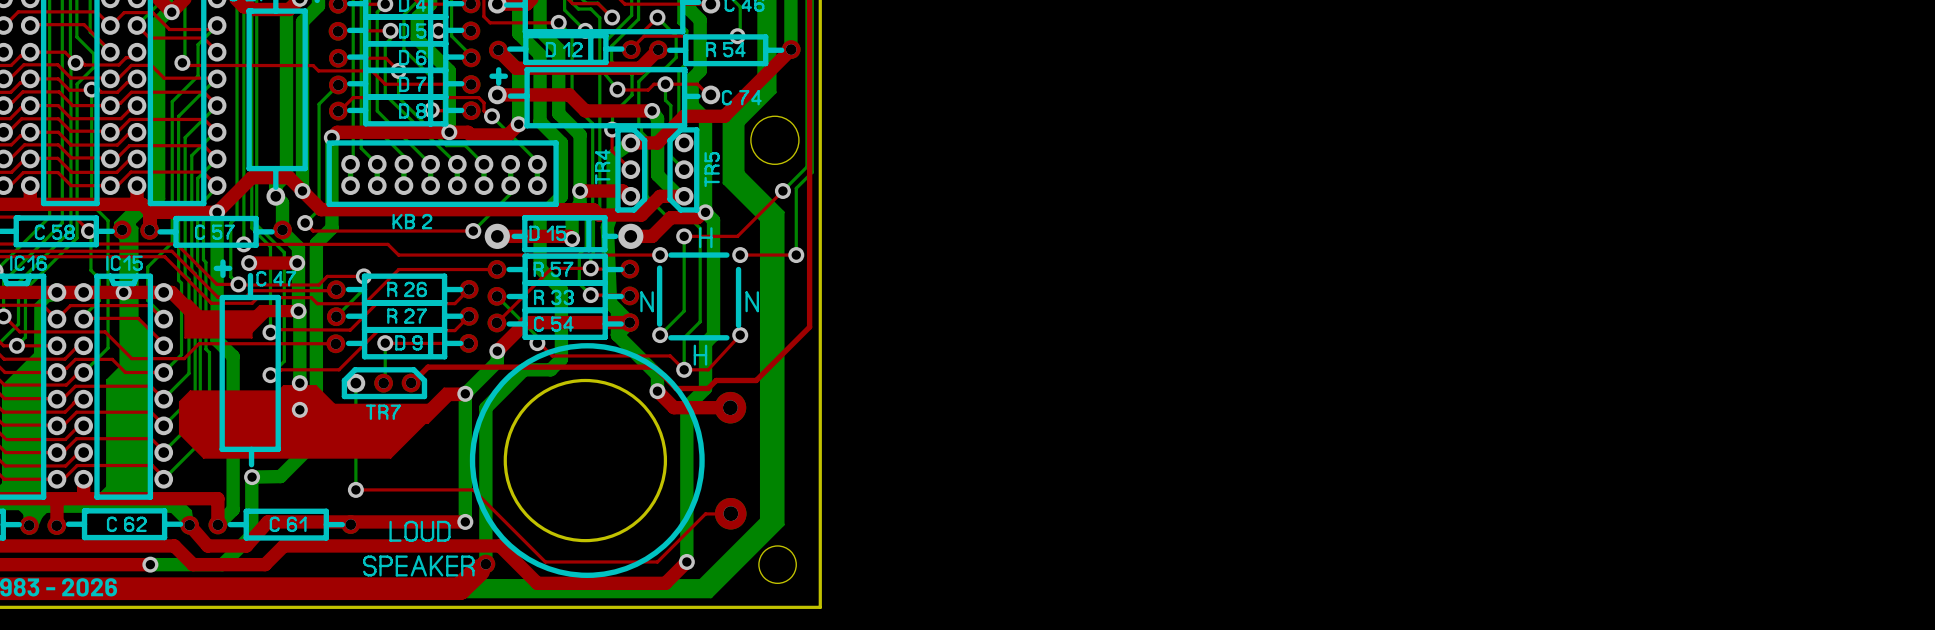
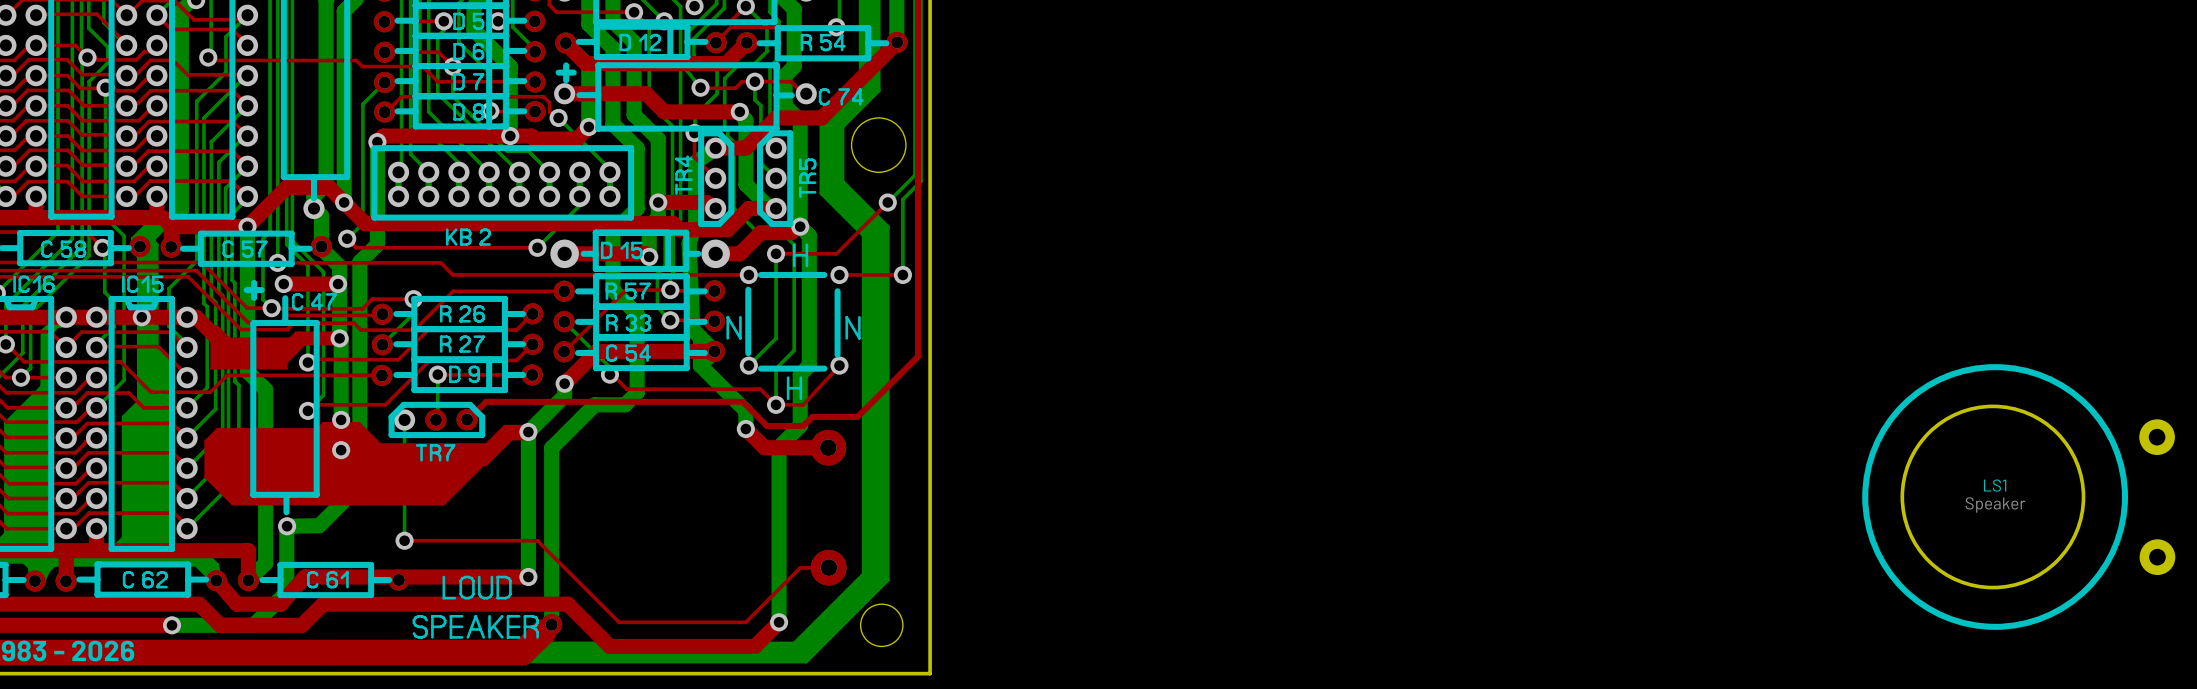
drawing: [469, 343, 705, 578] -> none
round board edge: [503, 378, 668, 543] -> none
LS1: none -> Speaker (2018, 496)

